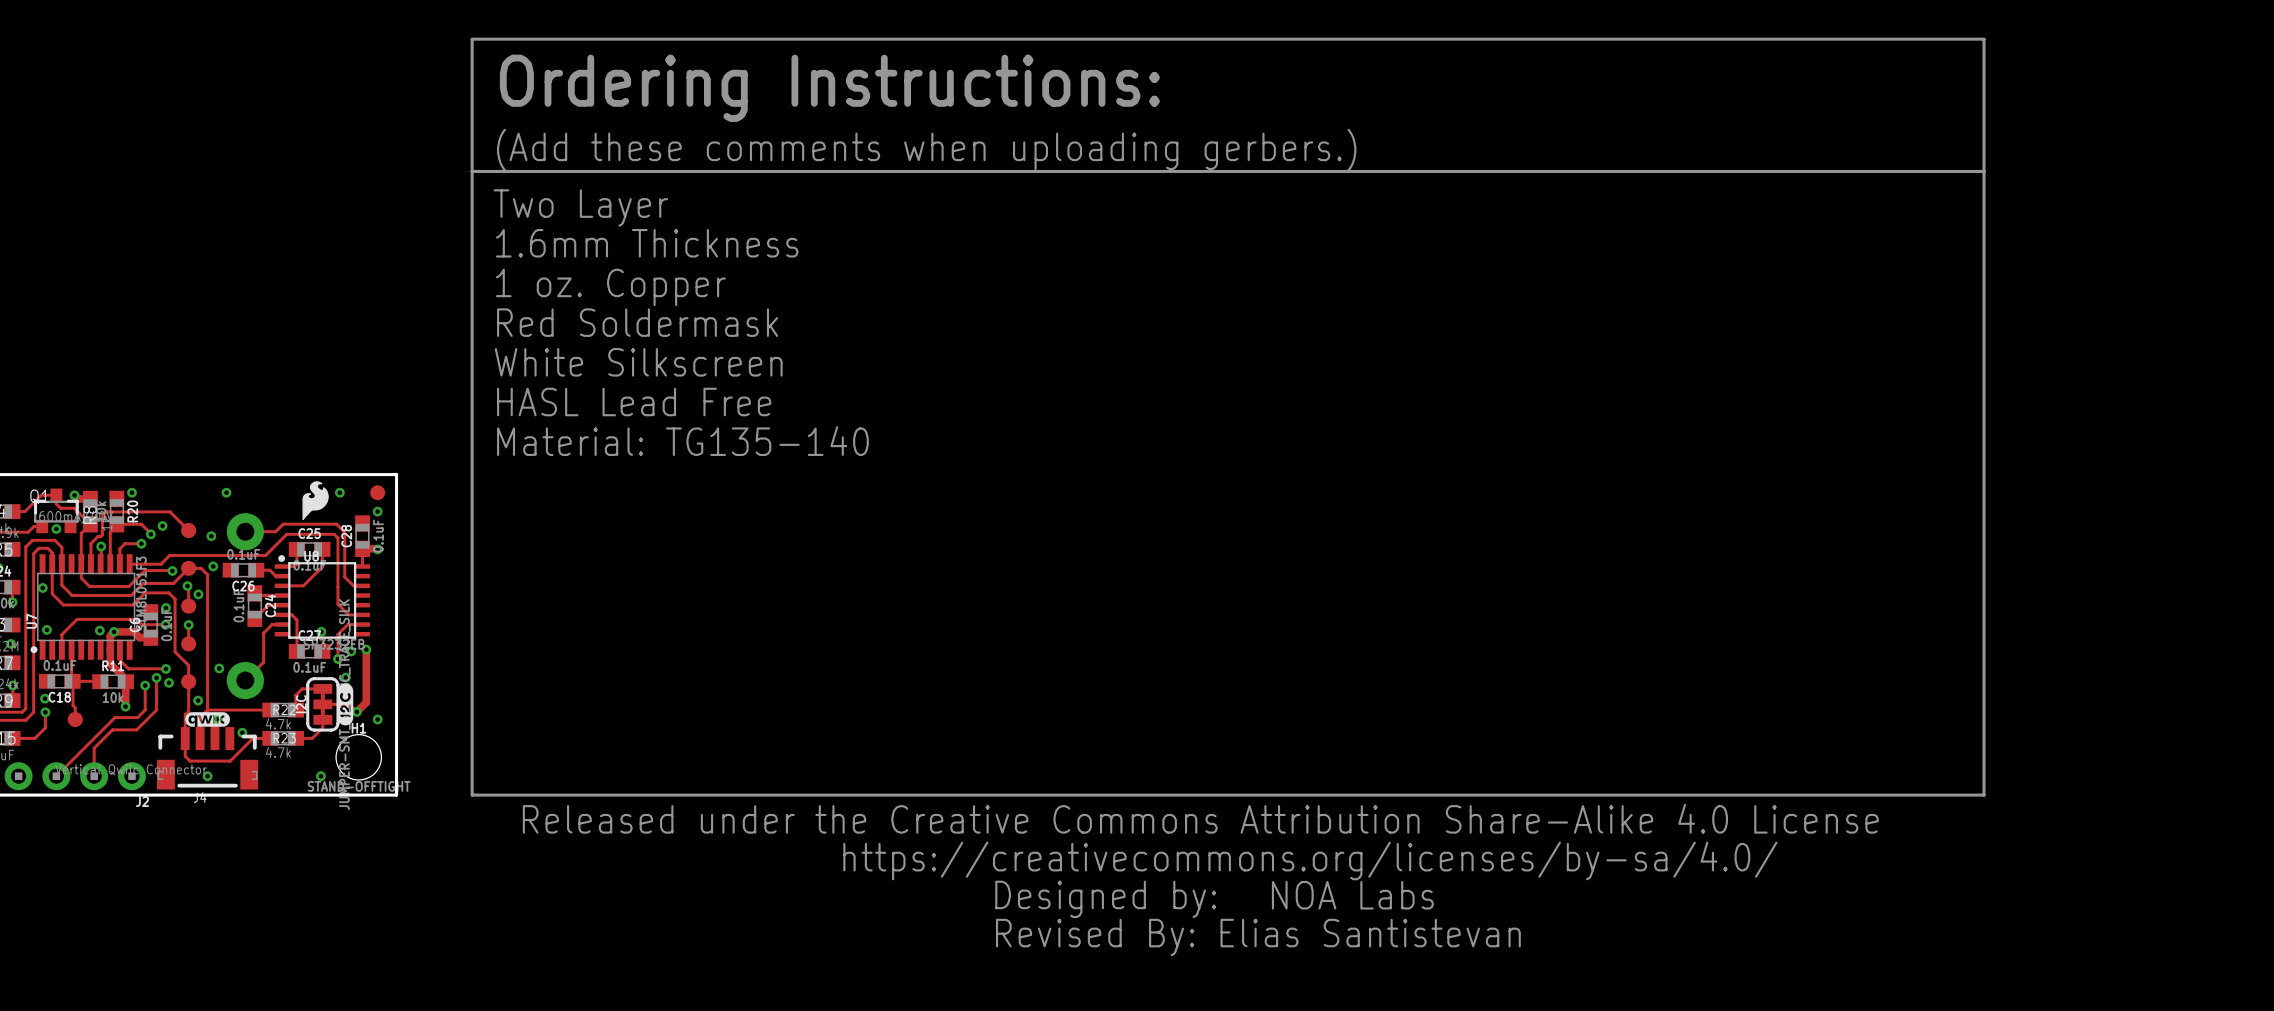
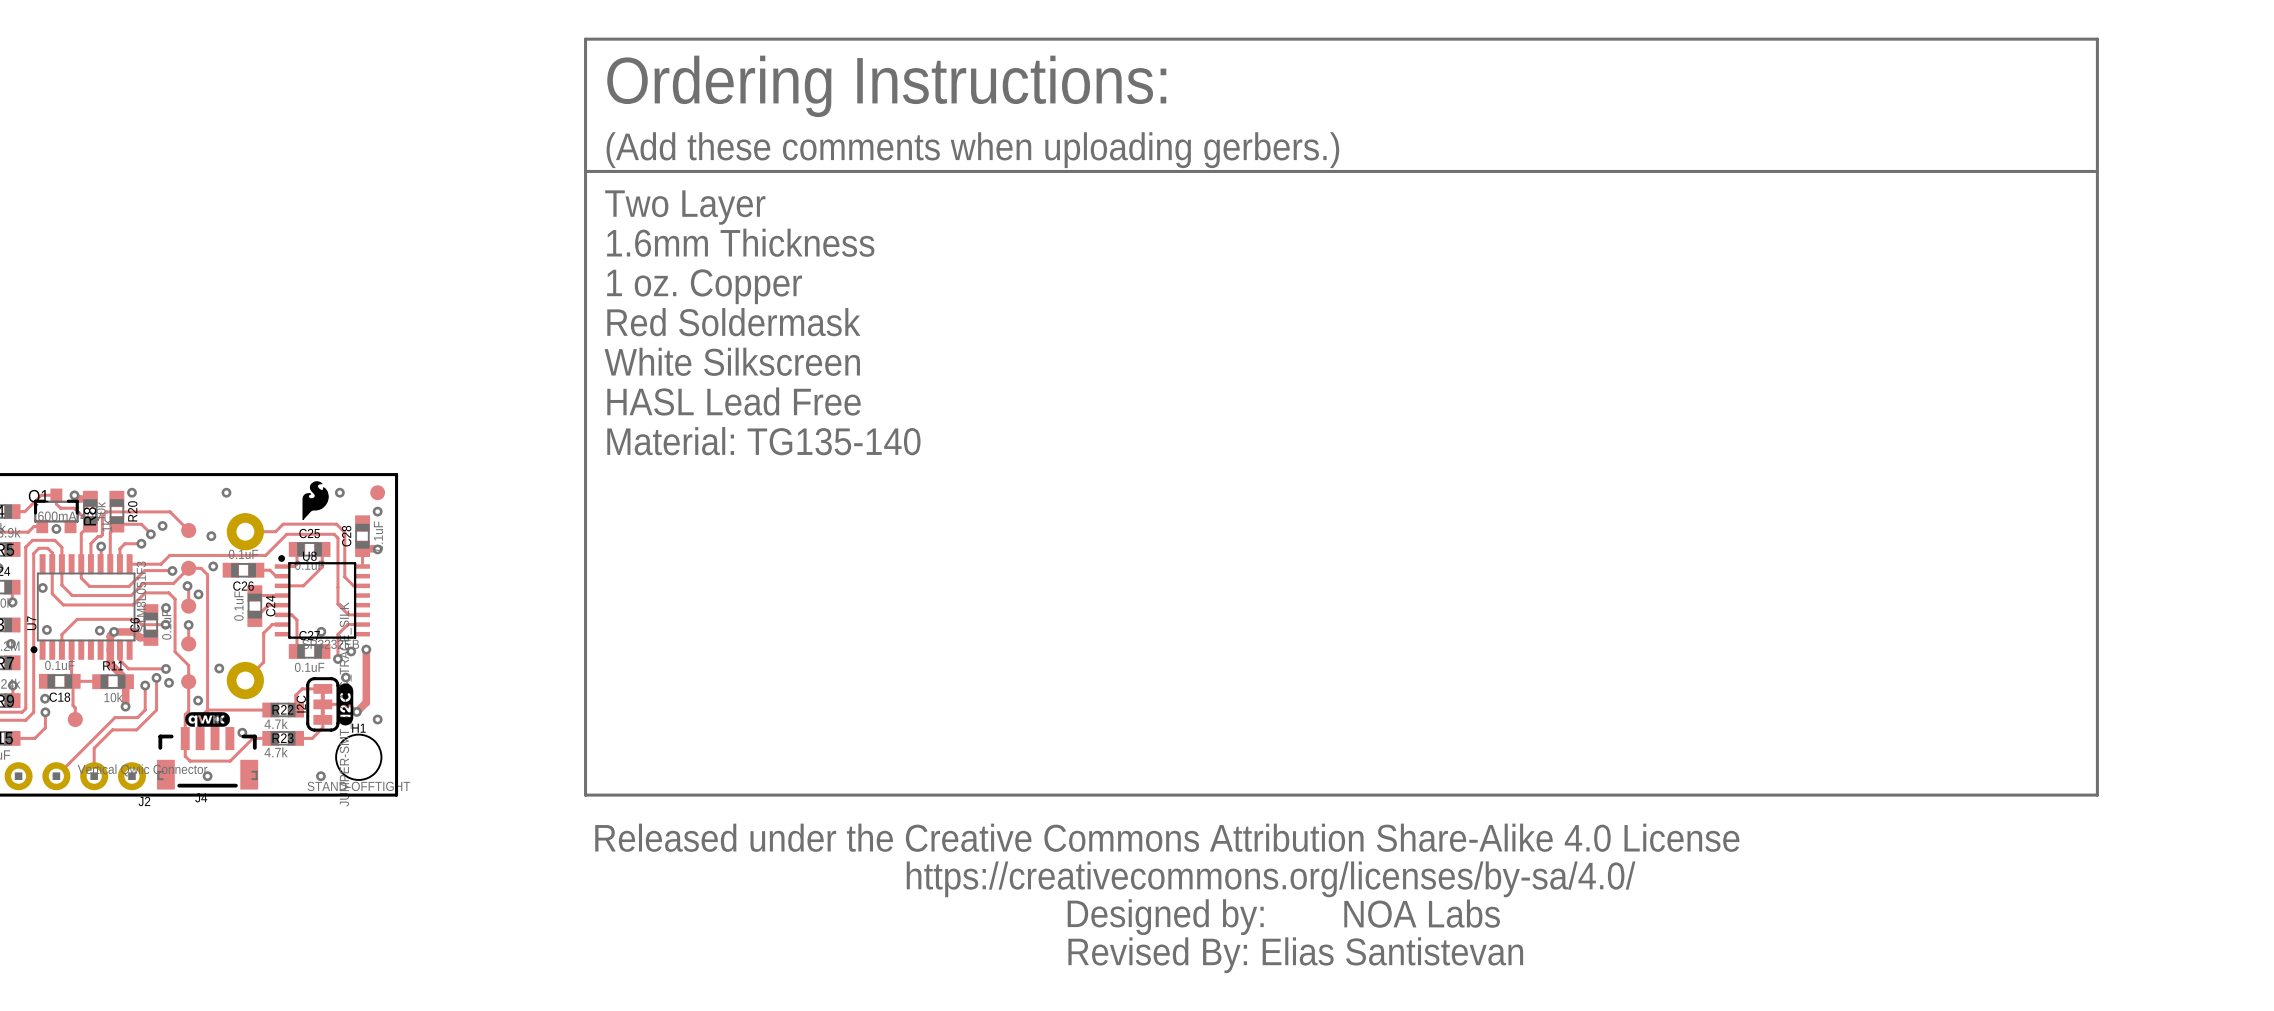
text position: Two Layer (580, 207) -> Two Layer (685, 207)
text position: 1.6mm Thickness (647, 243) -> 1.6mm Thickness (740, 242)
text position: 1 oz. Copper (610, 287) -> 1 oz. Copper (704, 286)
text position: Red Soldermask (637, 322) -> Red Soldermask (733, 322)
text position: White Silkscreen (638, 362) -> White Silkscreen (732, 361)
text position: HASL Lead Free (634, 402) -> HASL Lead Free (734, 401)
drawing position: (1228, 417) -> (1341, 417)
text position: Material: TG135-140 (682, 441) -> Material: TG135-140 (763, 441)
drawing position: (1200, 860) -> (1167, 879)
text position: NOA Labs (1352, 895) -> NOA Labs (1422, 913)
text position: Revised By: Elias Santistevan (1258, 937) -> Revised By: Elias Santistevan (1295, 955)

